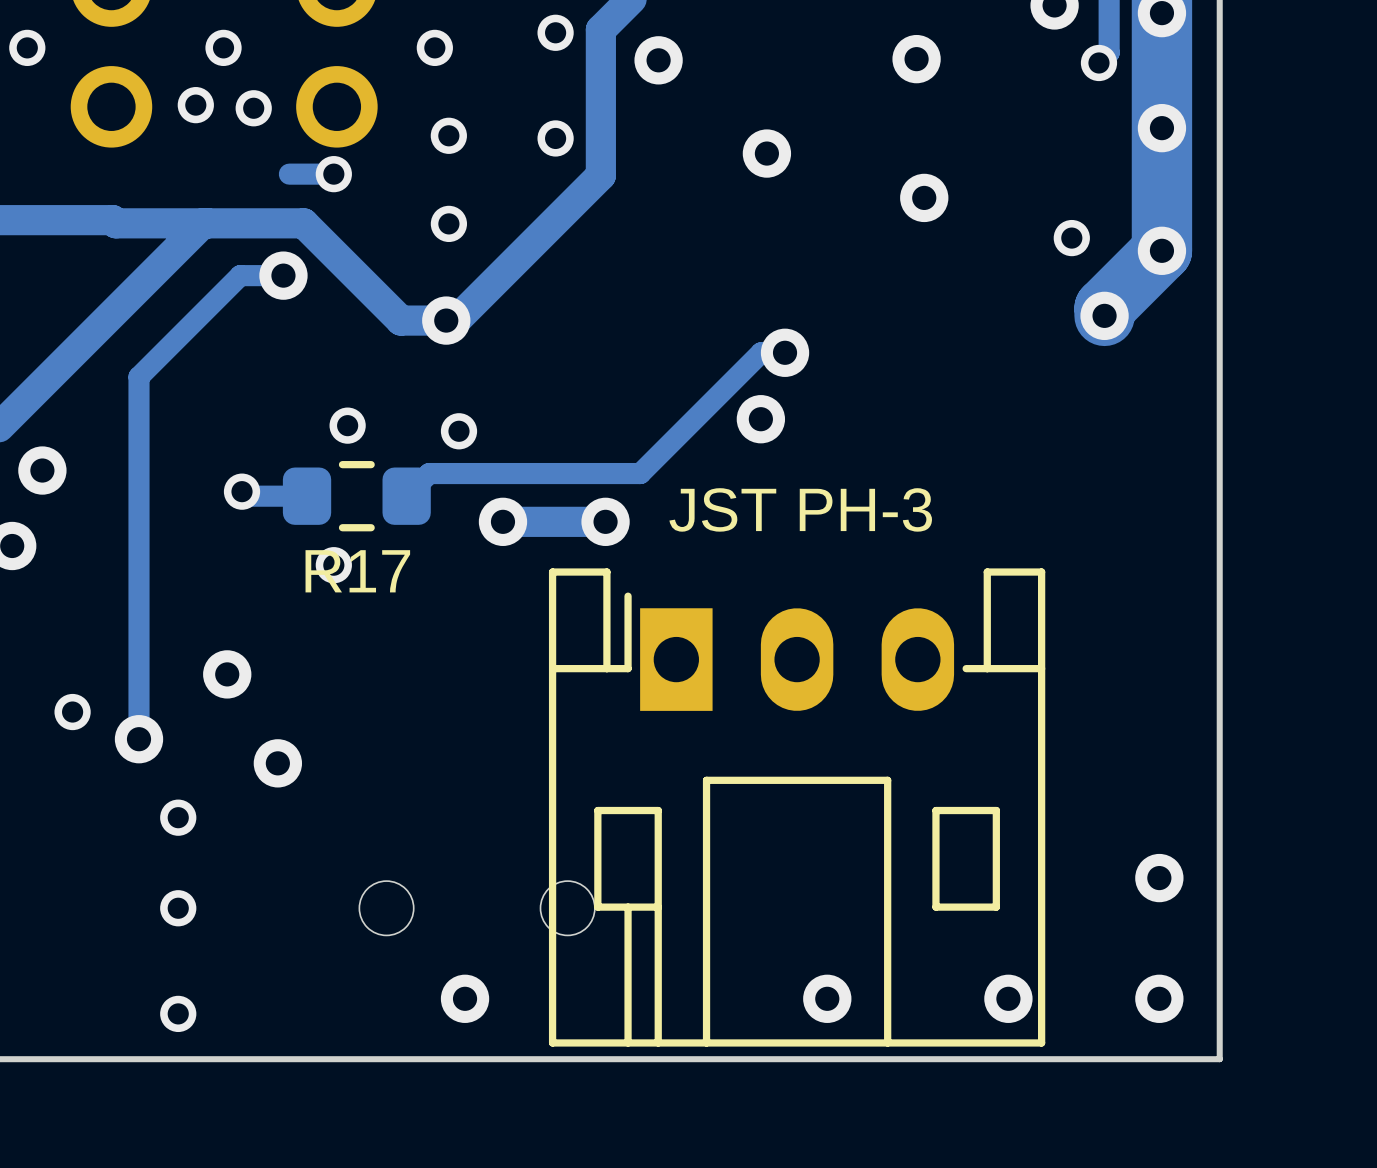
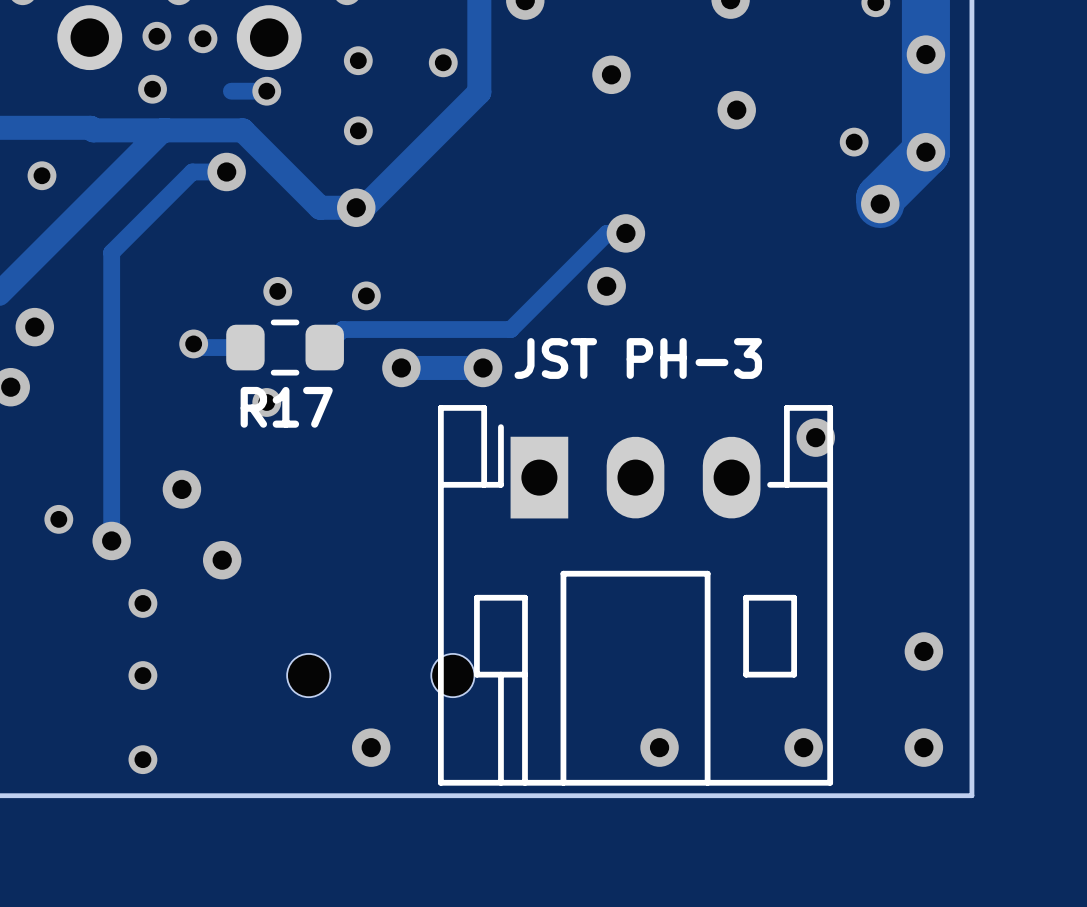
via: none -> (152, 89)
via: none -> (41, 175)
via: none -> (815, 437)

